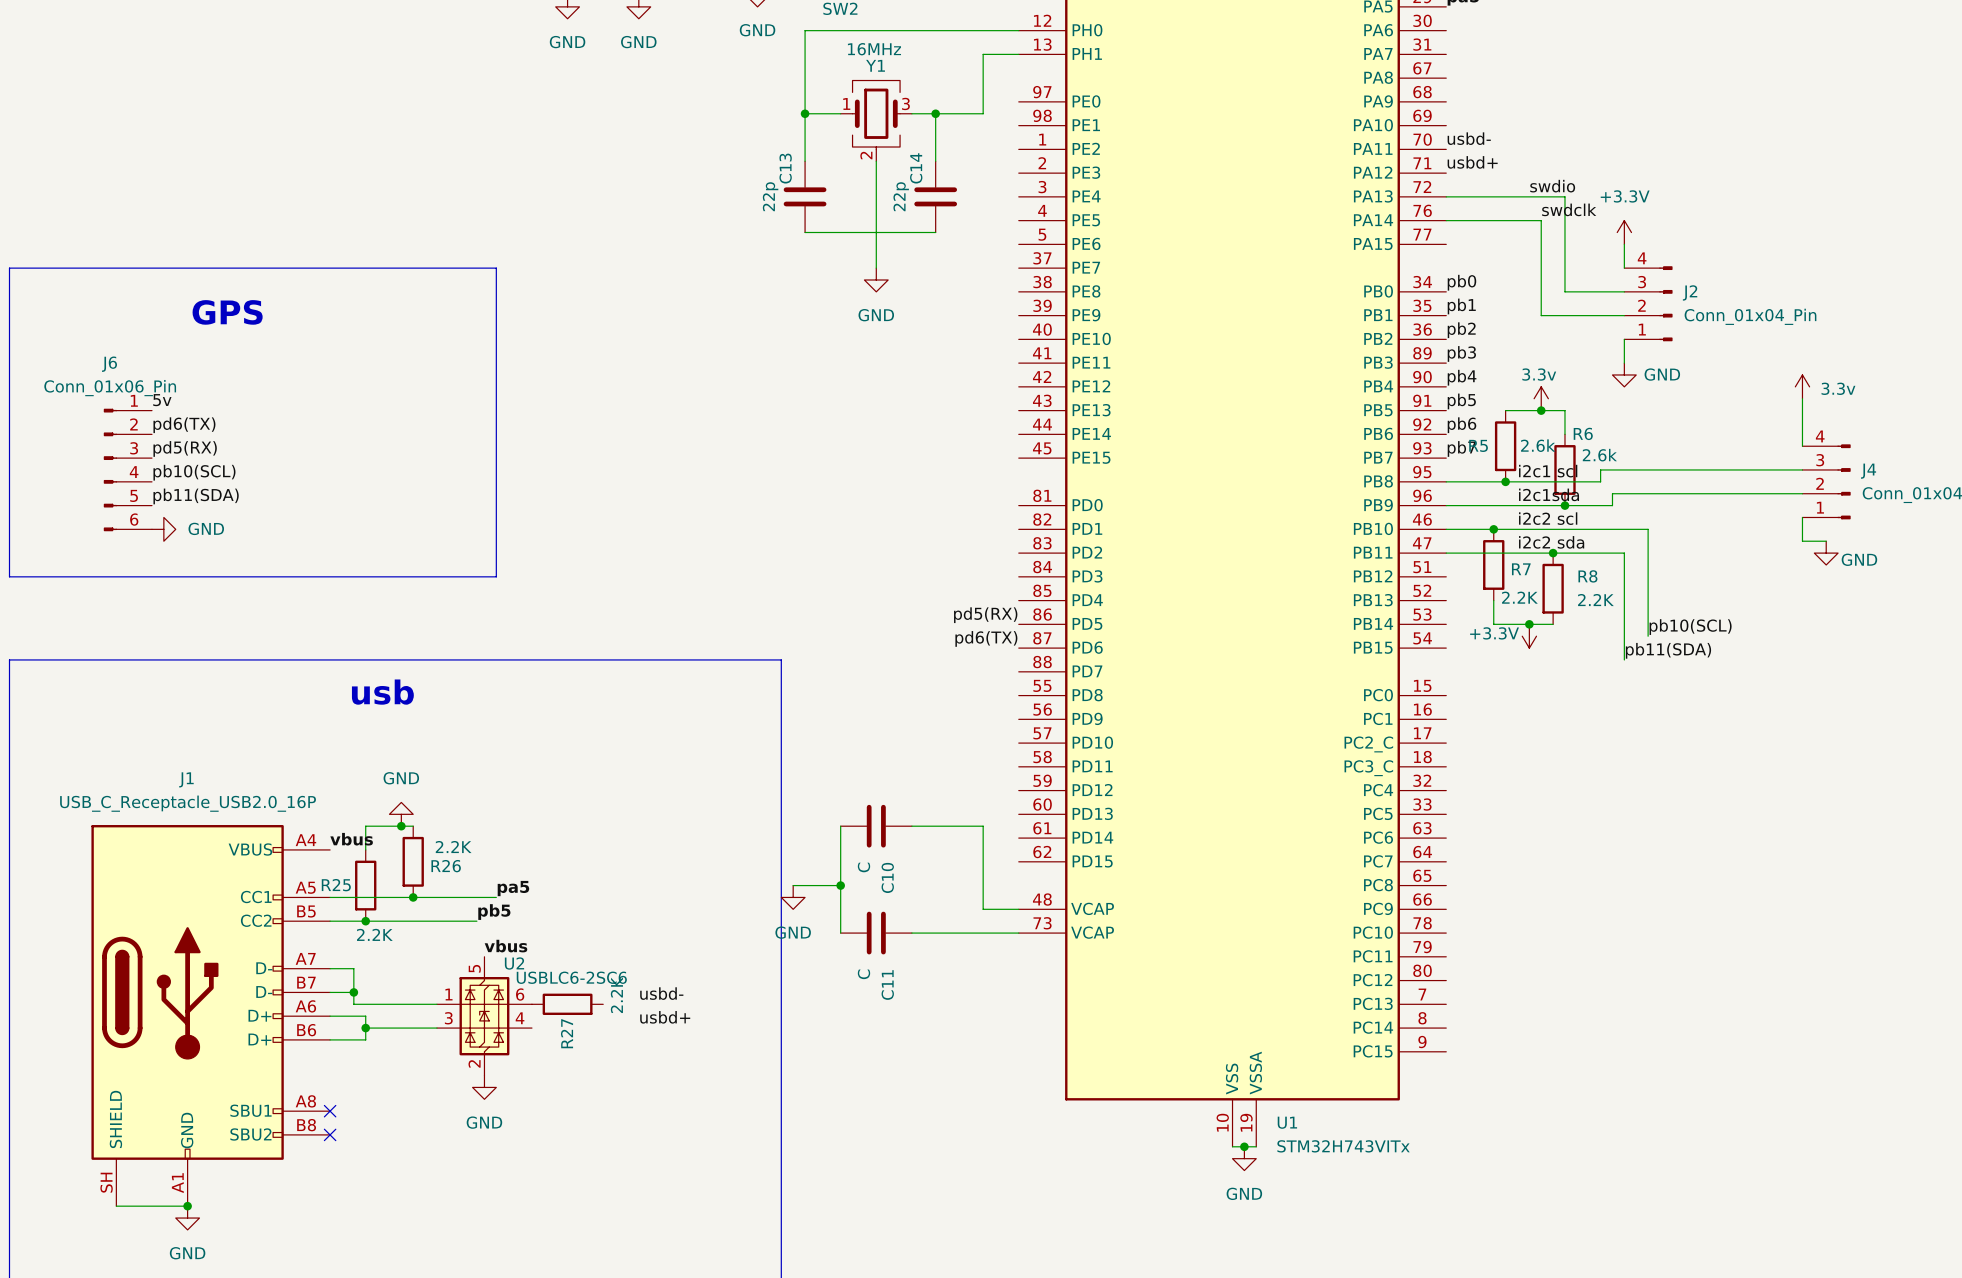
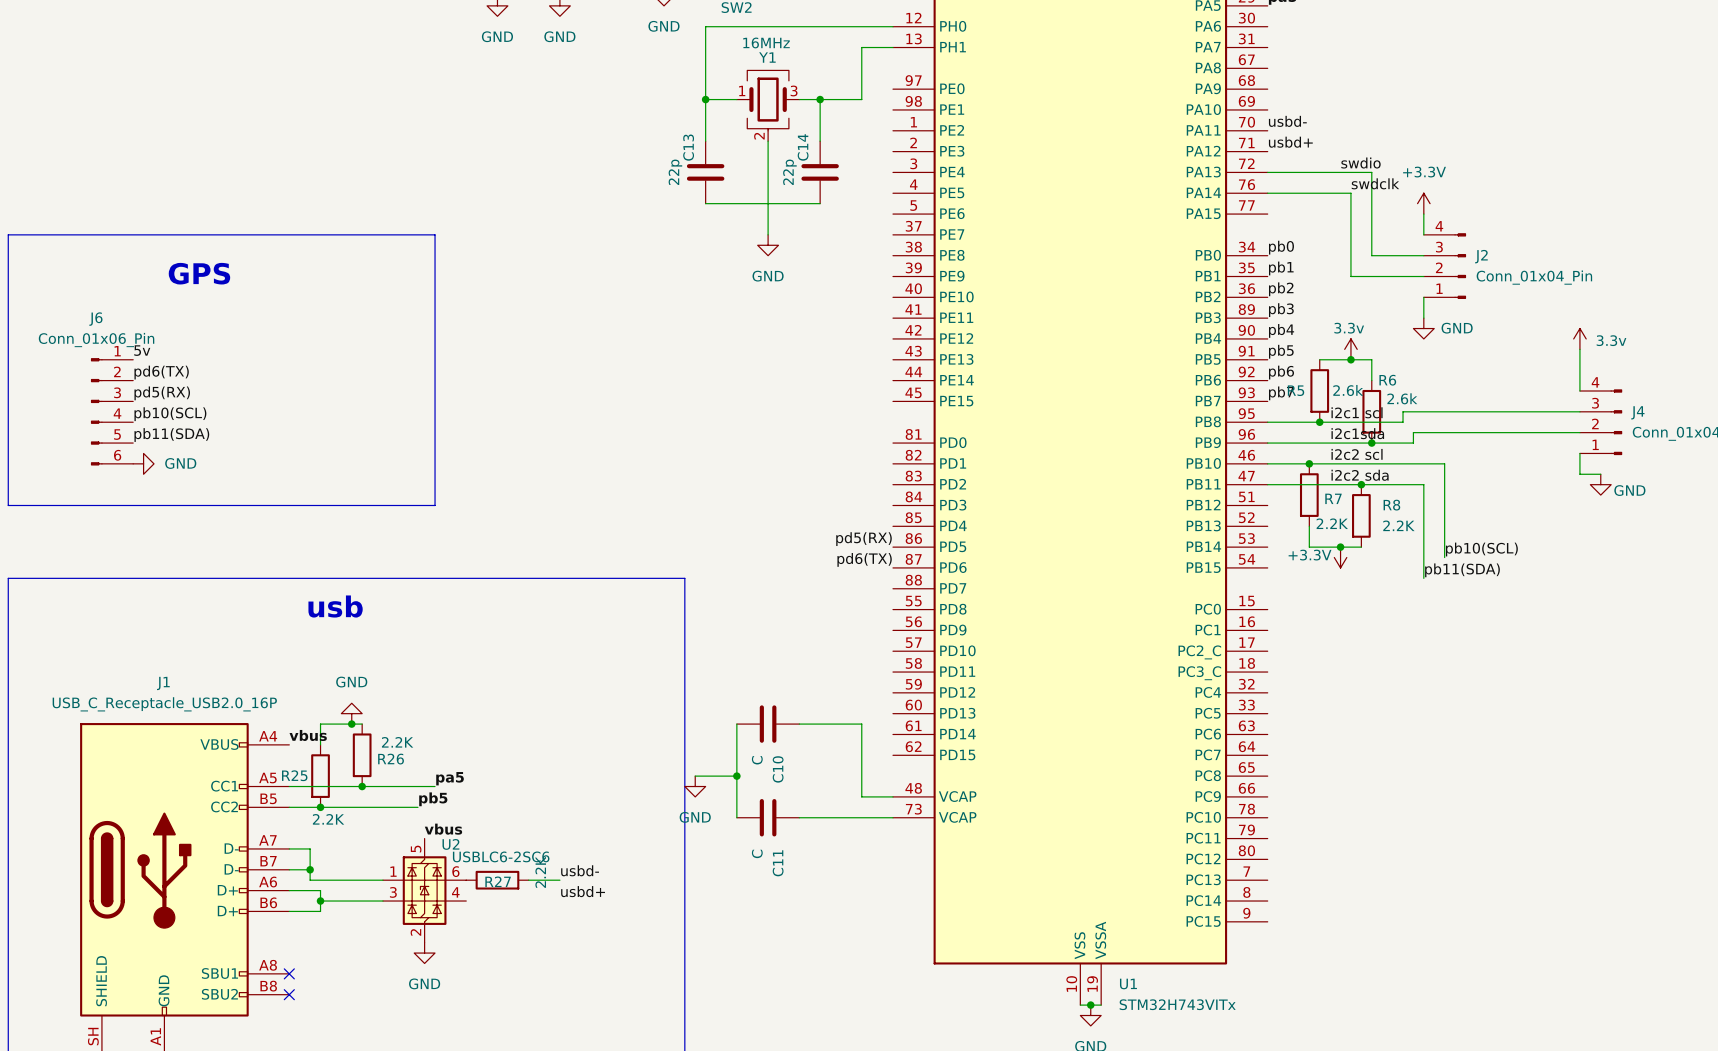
wire: none -> (528, 880) (559, 880)
R27 name rotation: 0° (567, 1033) -> 90° clockwise (498, 881)

